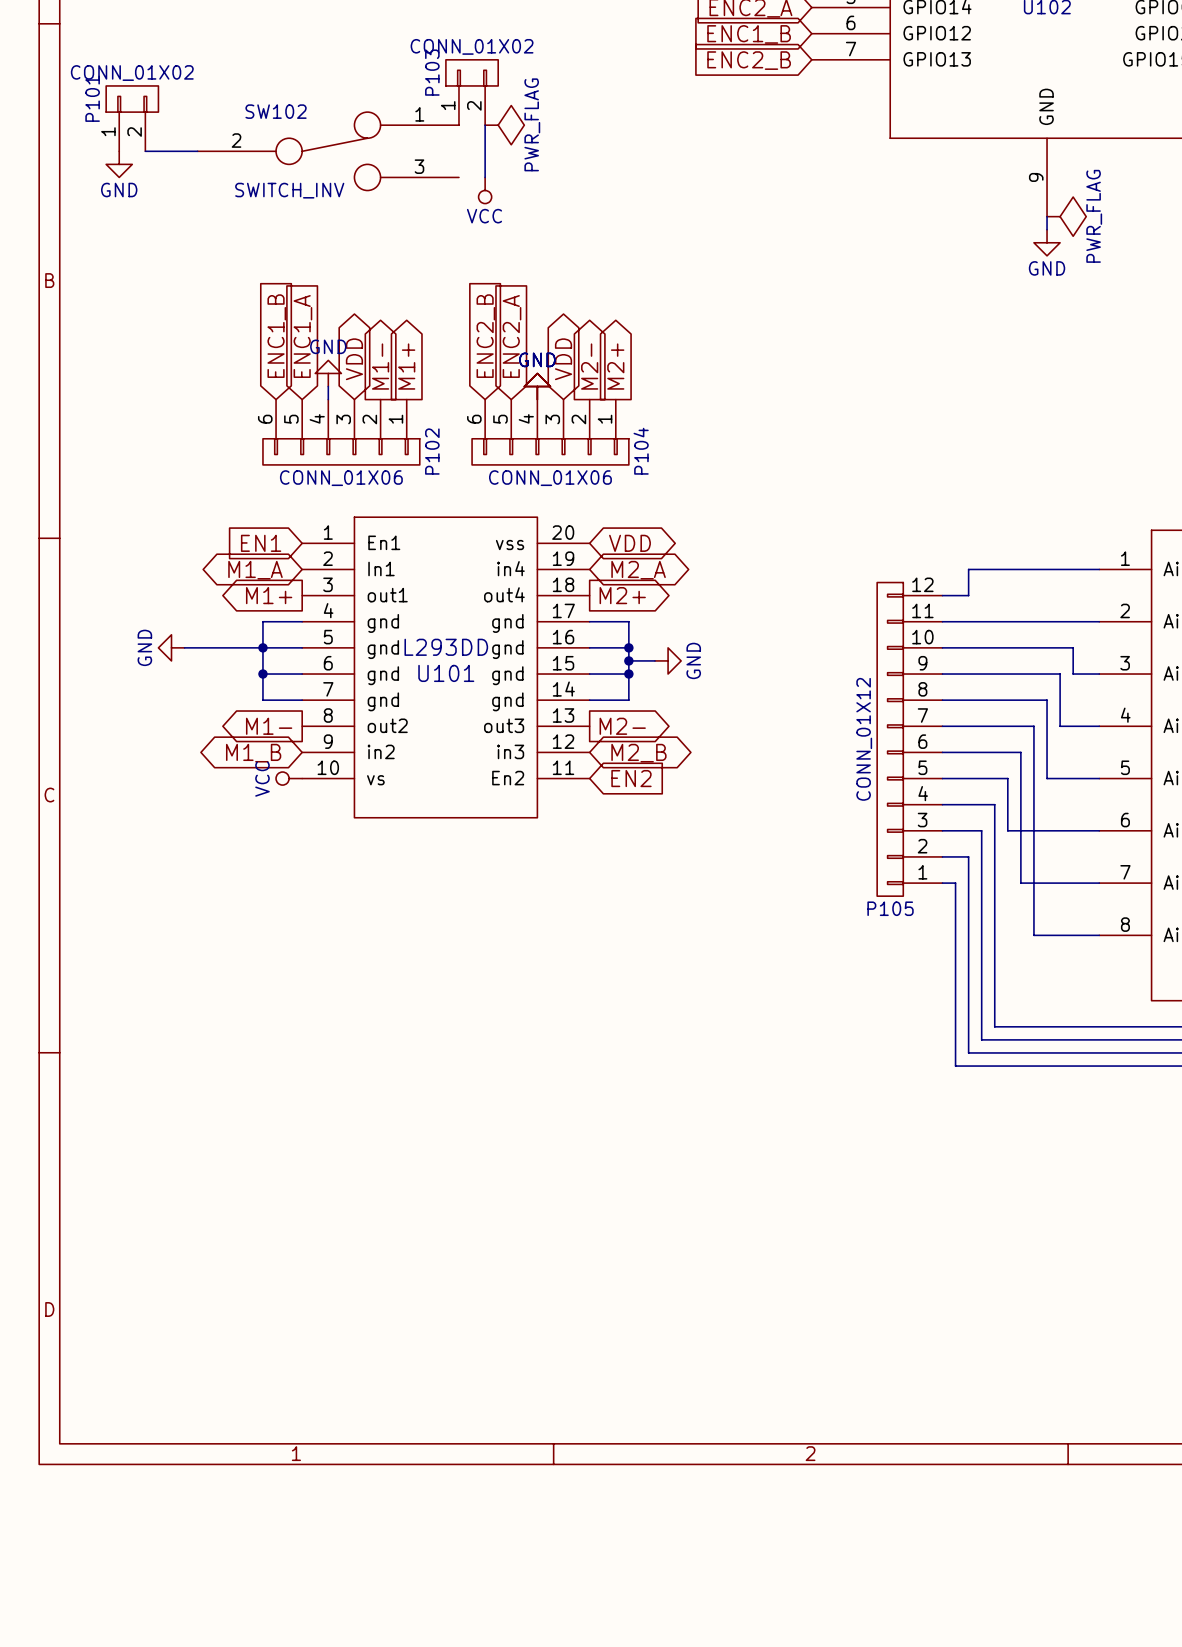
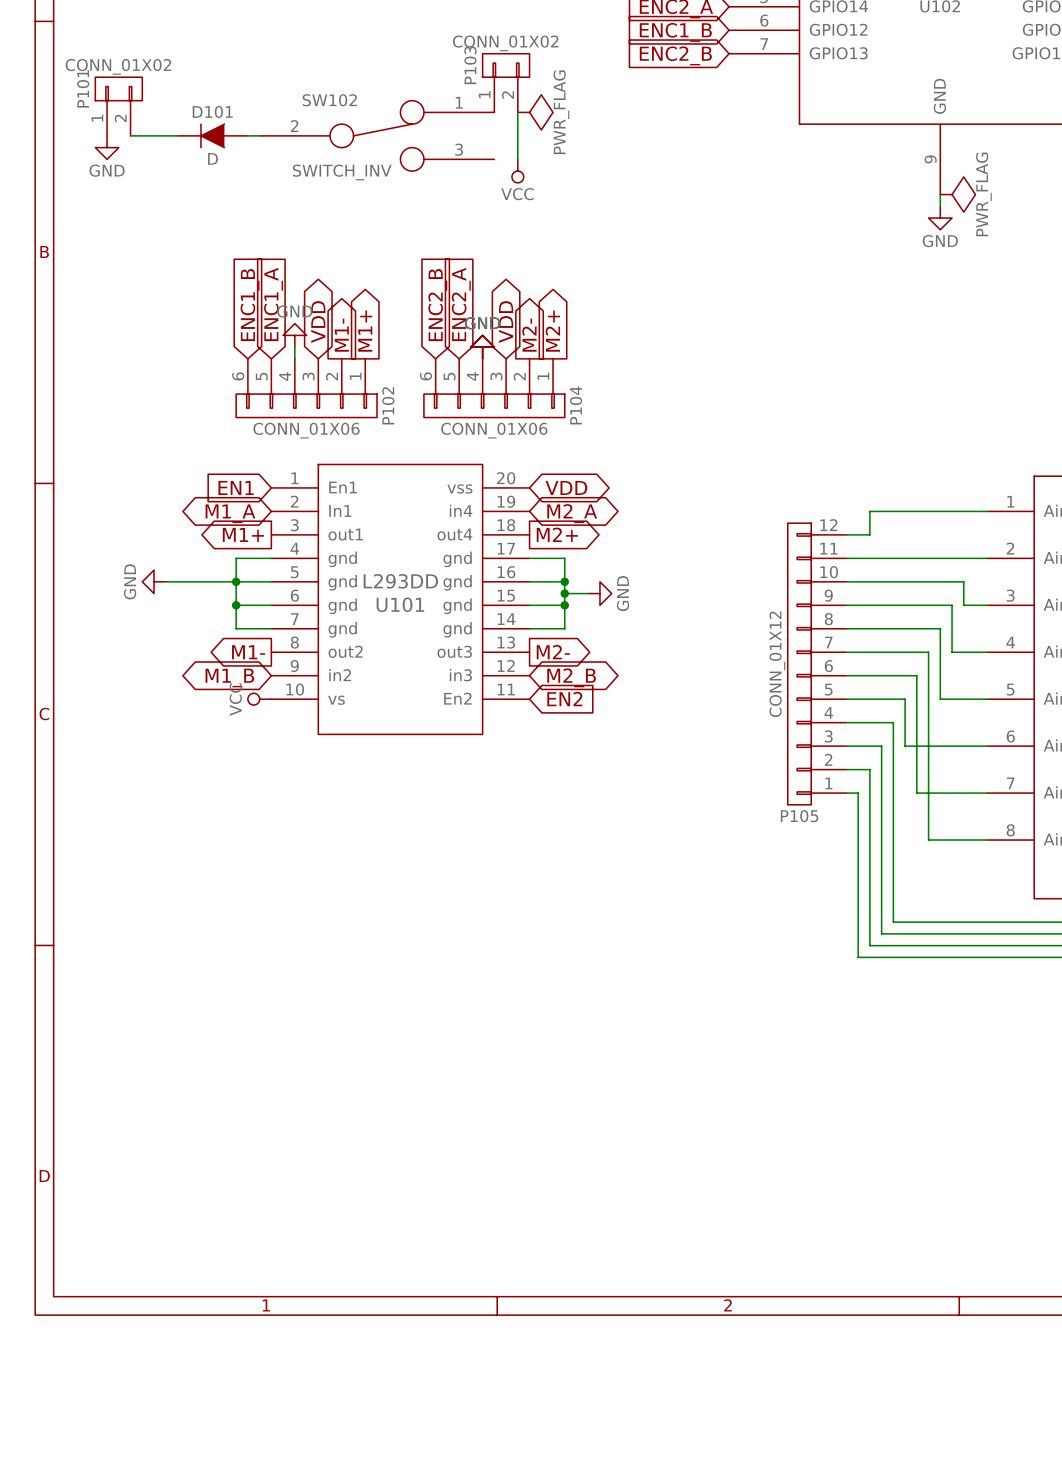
P103 position: (472, 92) -> (506, 83)
wire: (485, 125) (485, 177) -> (517, 112) (517, 159)
power symbol position: PWR_FLAG (504, 125) -> PWR_FLAG (535, 112)
D101: none -> D (212, 135)
wire: none -> (247, 135) (259, 135)
SW102 position: (328, 151) -> (376, 135)
power symbol position: VCC (485, 190) -> VCC (517, 171)

